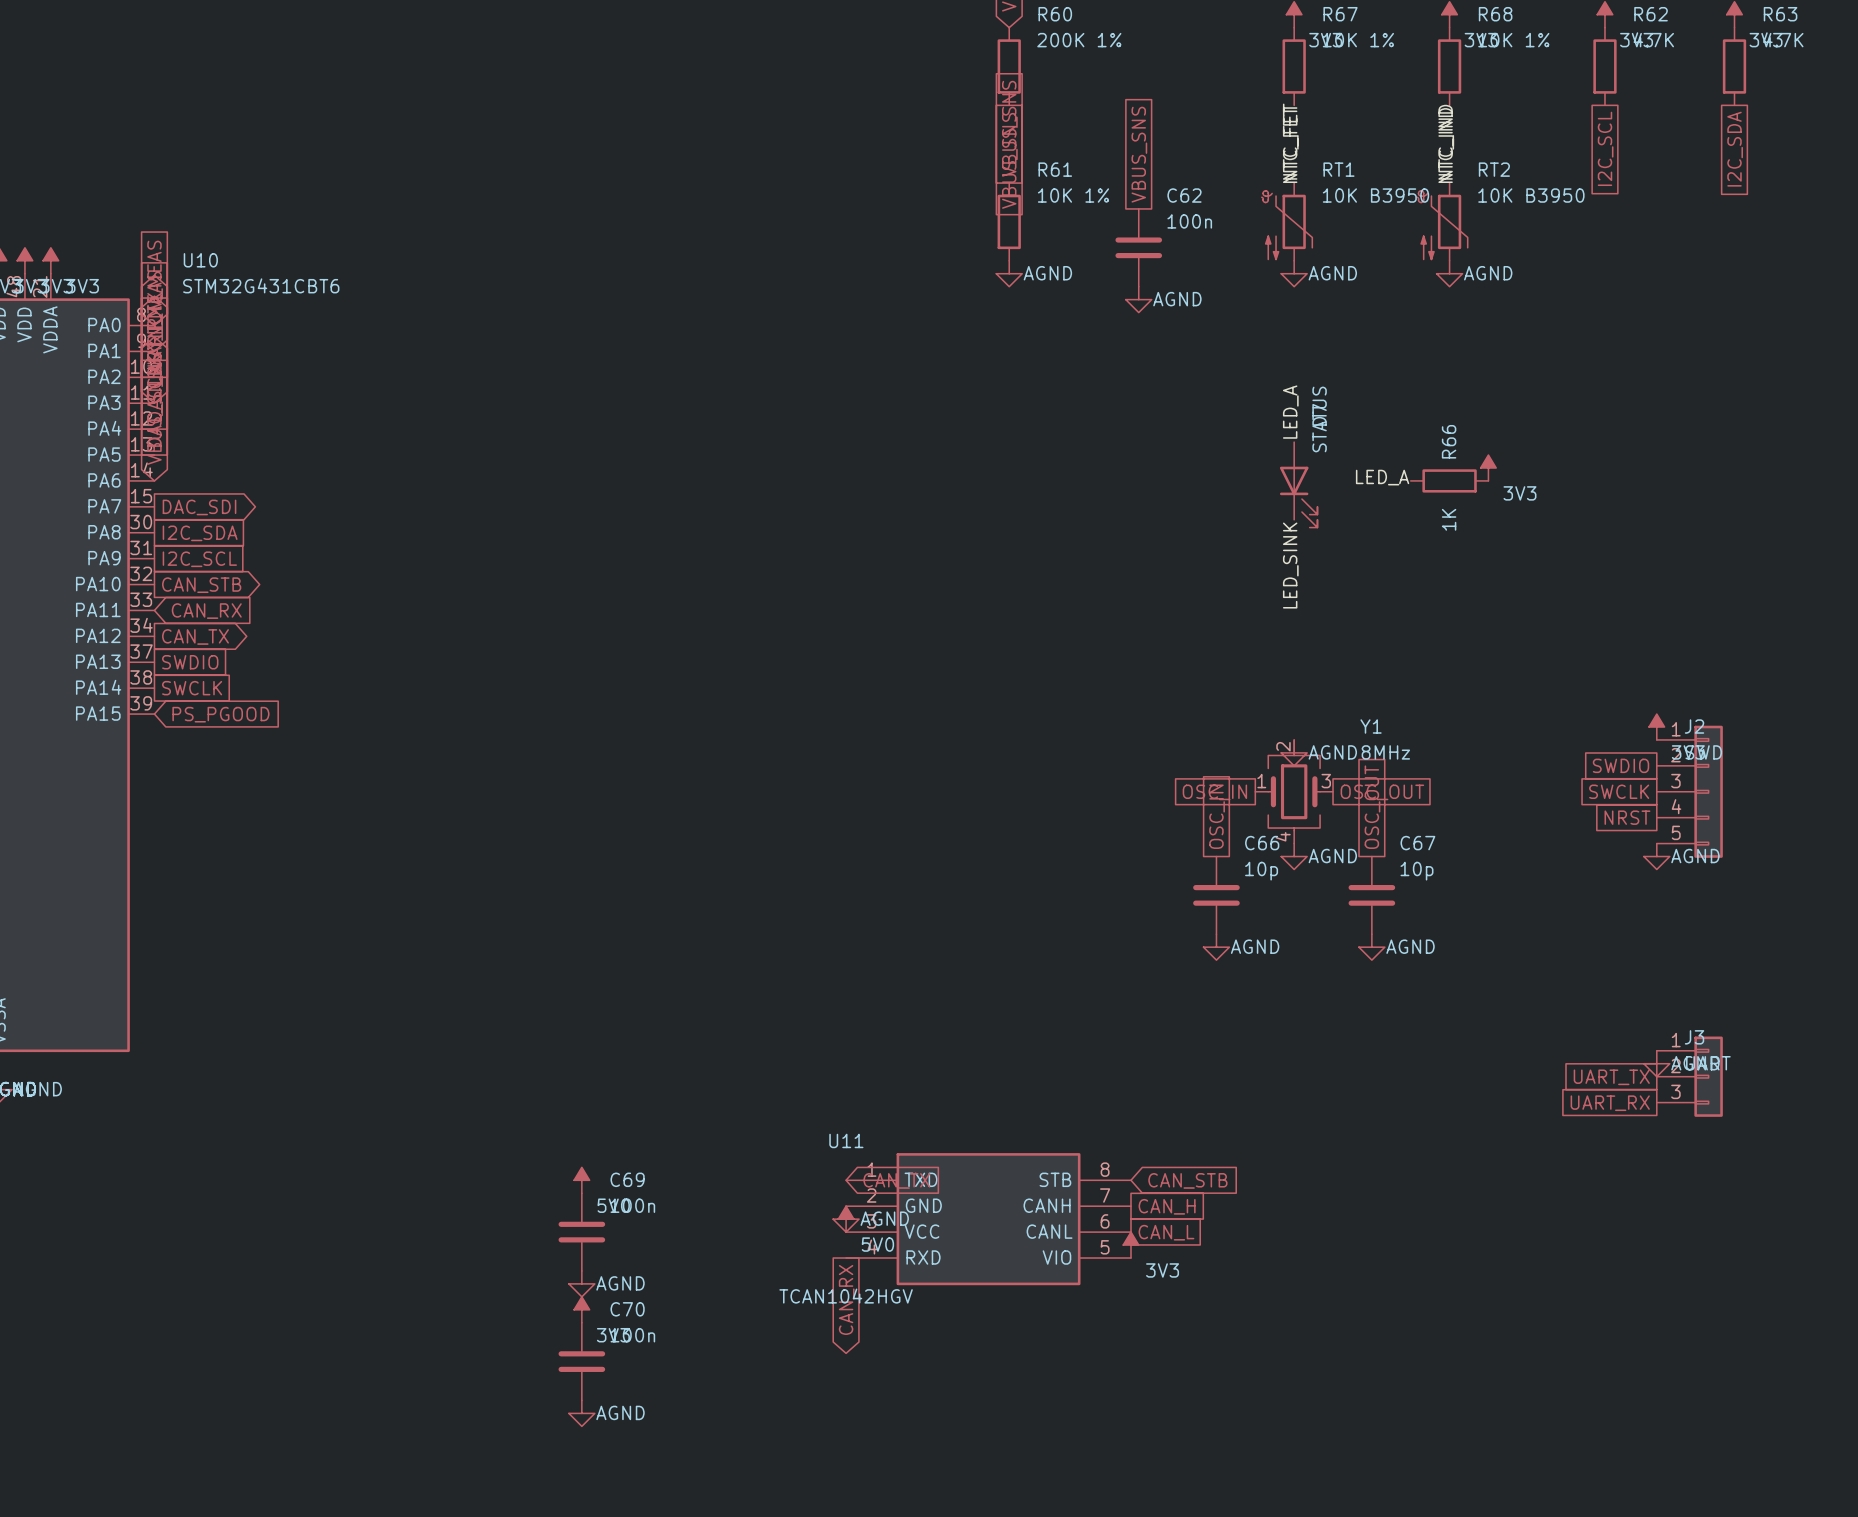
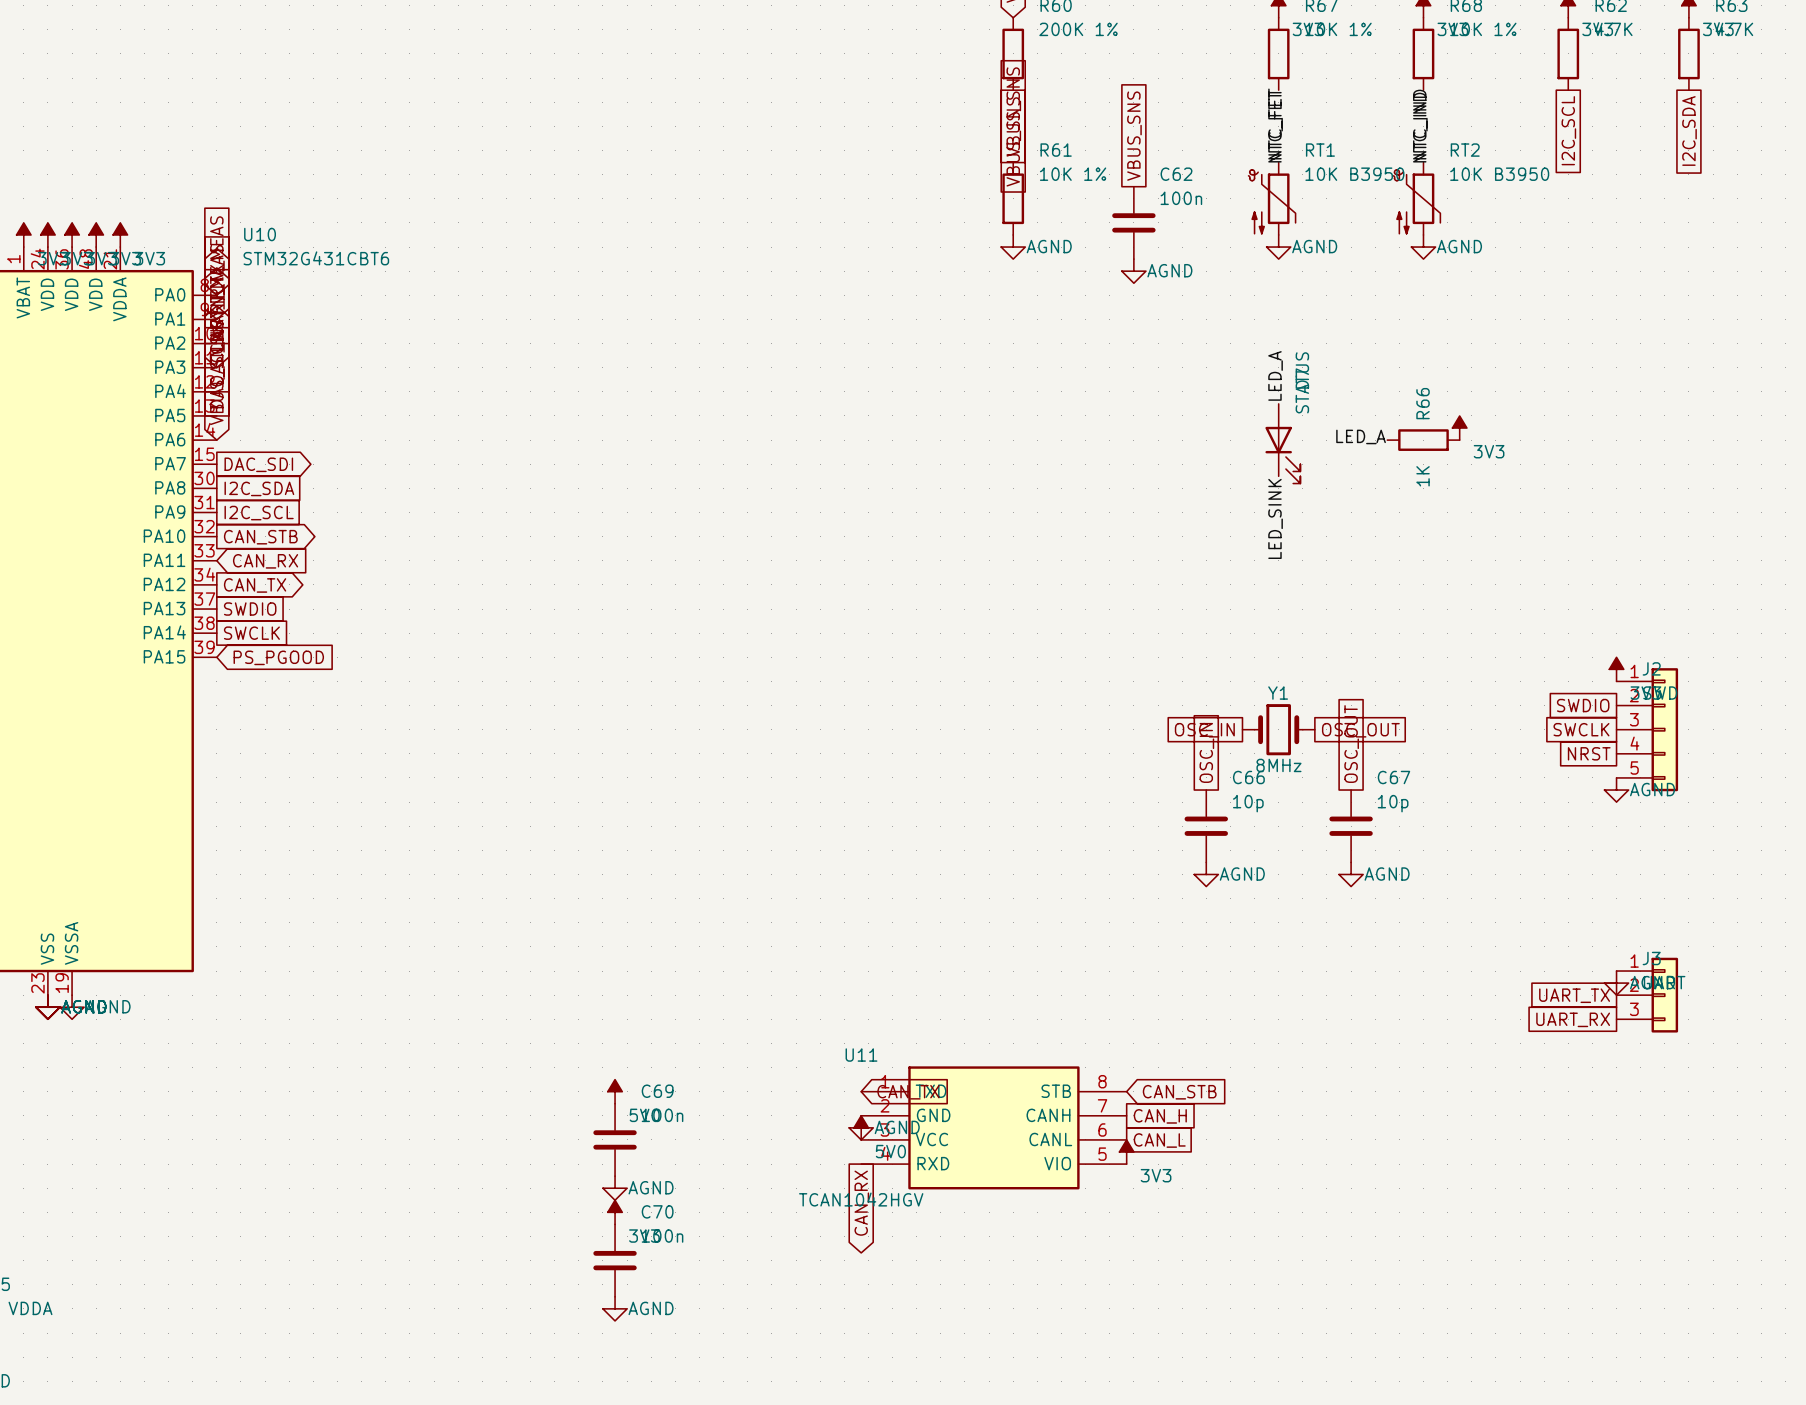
Y1 name position: Y1 (1371, 726) -> Y1 (1278, 693)
Y1 symbol: [1255, 739, 1334, 844] -> [1242, 704, 1315, 756]
power symbol: AGND (1294, 752) -> none
Y1 value position: 8MHz (1385, 752) -> 8MHz (1278, 765)
power symbol: AGND (1294, 856) -> none

